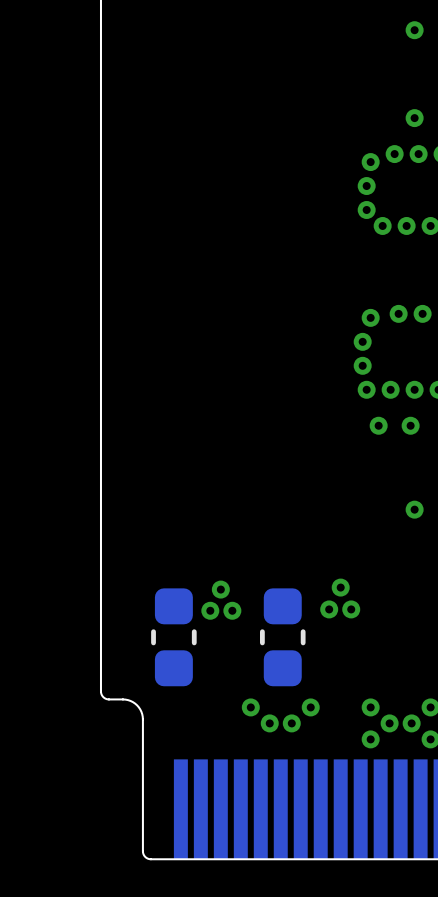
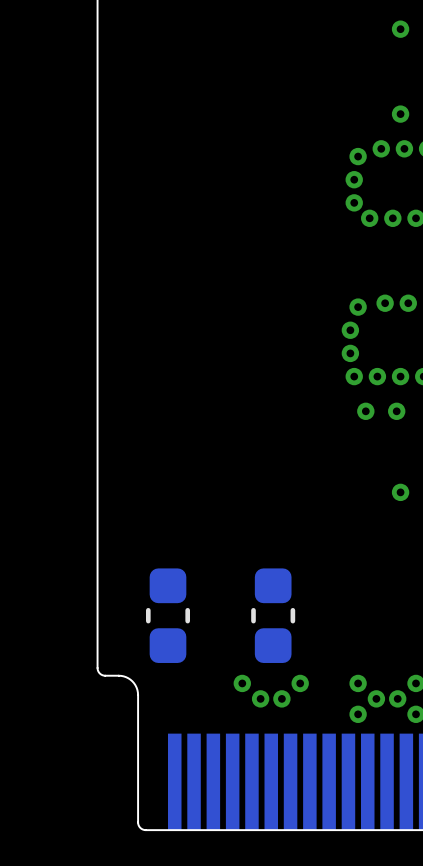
via: (340, 587) -> none
via: (220, 589) -> none
via: (329, 609) -> none
via: (351, 609) -> none
via: (210, 610) -> none
via: (232, 610) -> none

